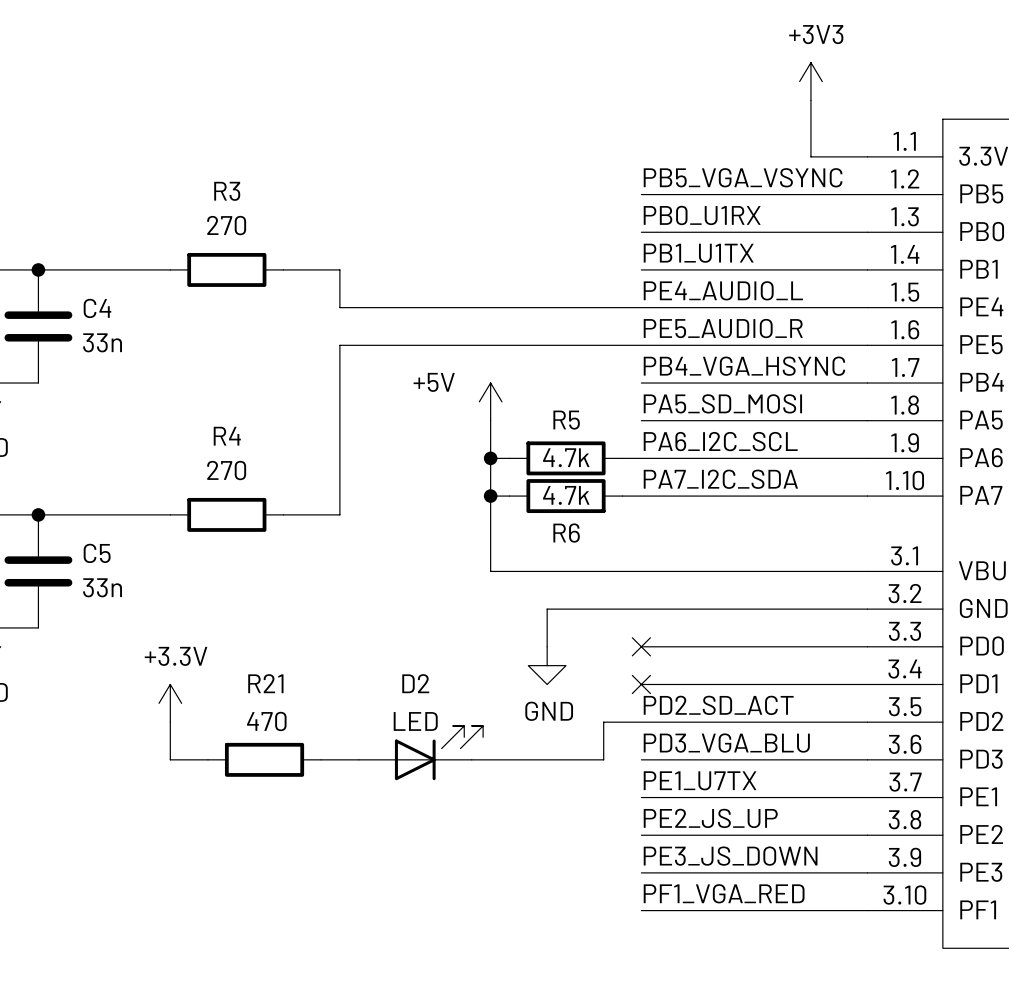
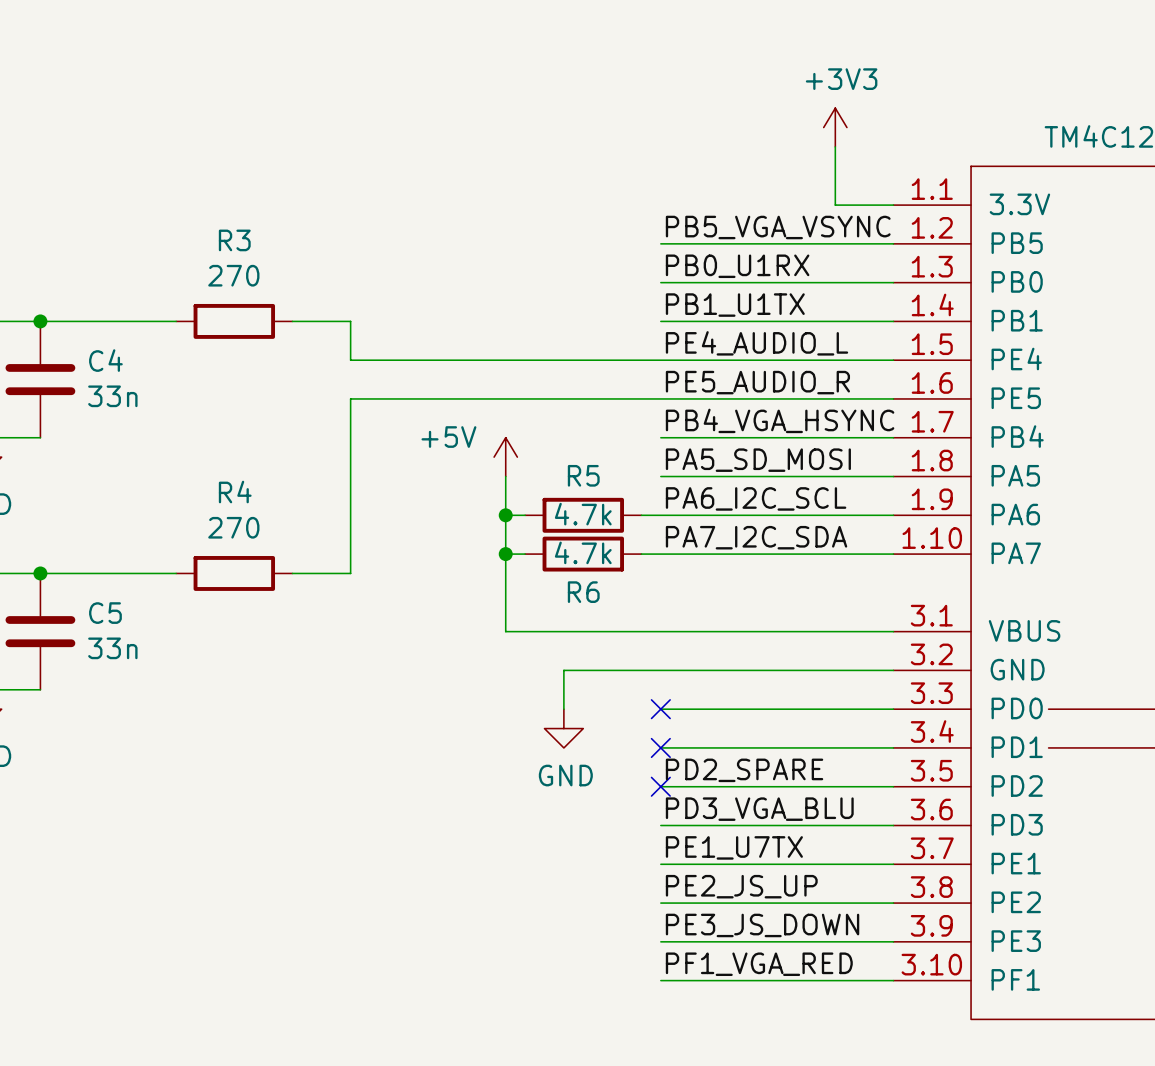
power symbol: +3.3V (170, 703) -> none
label: PD2_SD_ACT (718, 705) -> PD2_SPARE (744, 770)
wire: (170, 722) (170, 759) (208, 759) -> none
wire: (641, 722) (603, 722) (603, 759) (471, 759) -> none
no-connect mark: none -> (660, 786)
D2: LED (420, 753) -> none
R21: 470 (264, 759) -> none
wire: (321, 759) (358, 759) -> none

